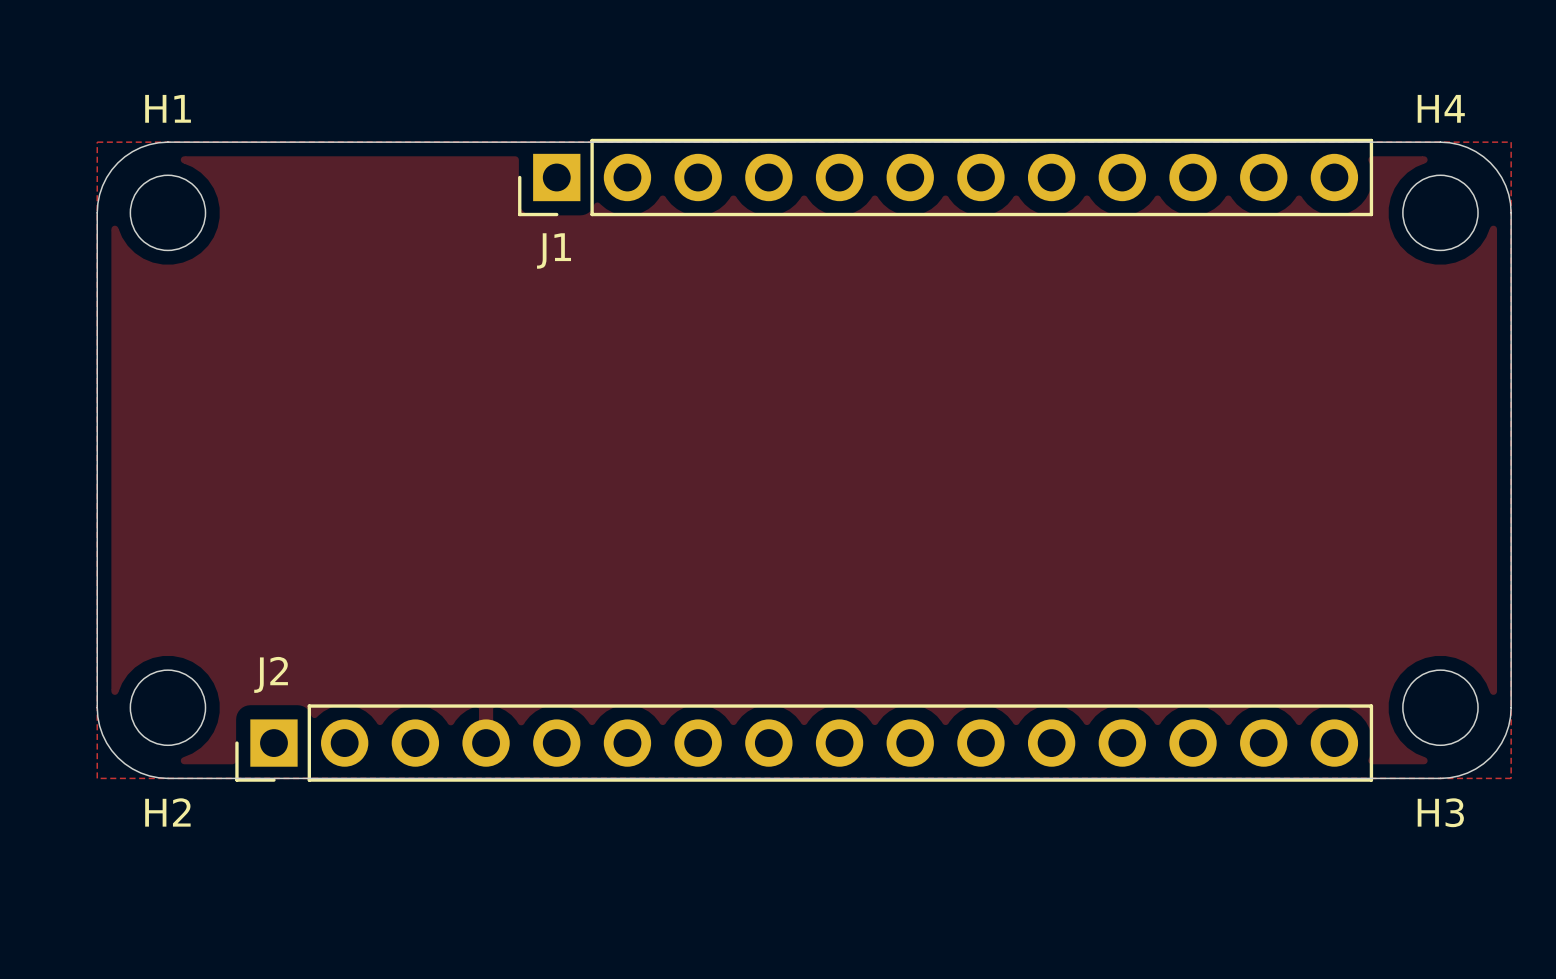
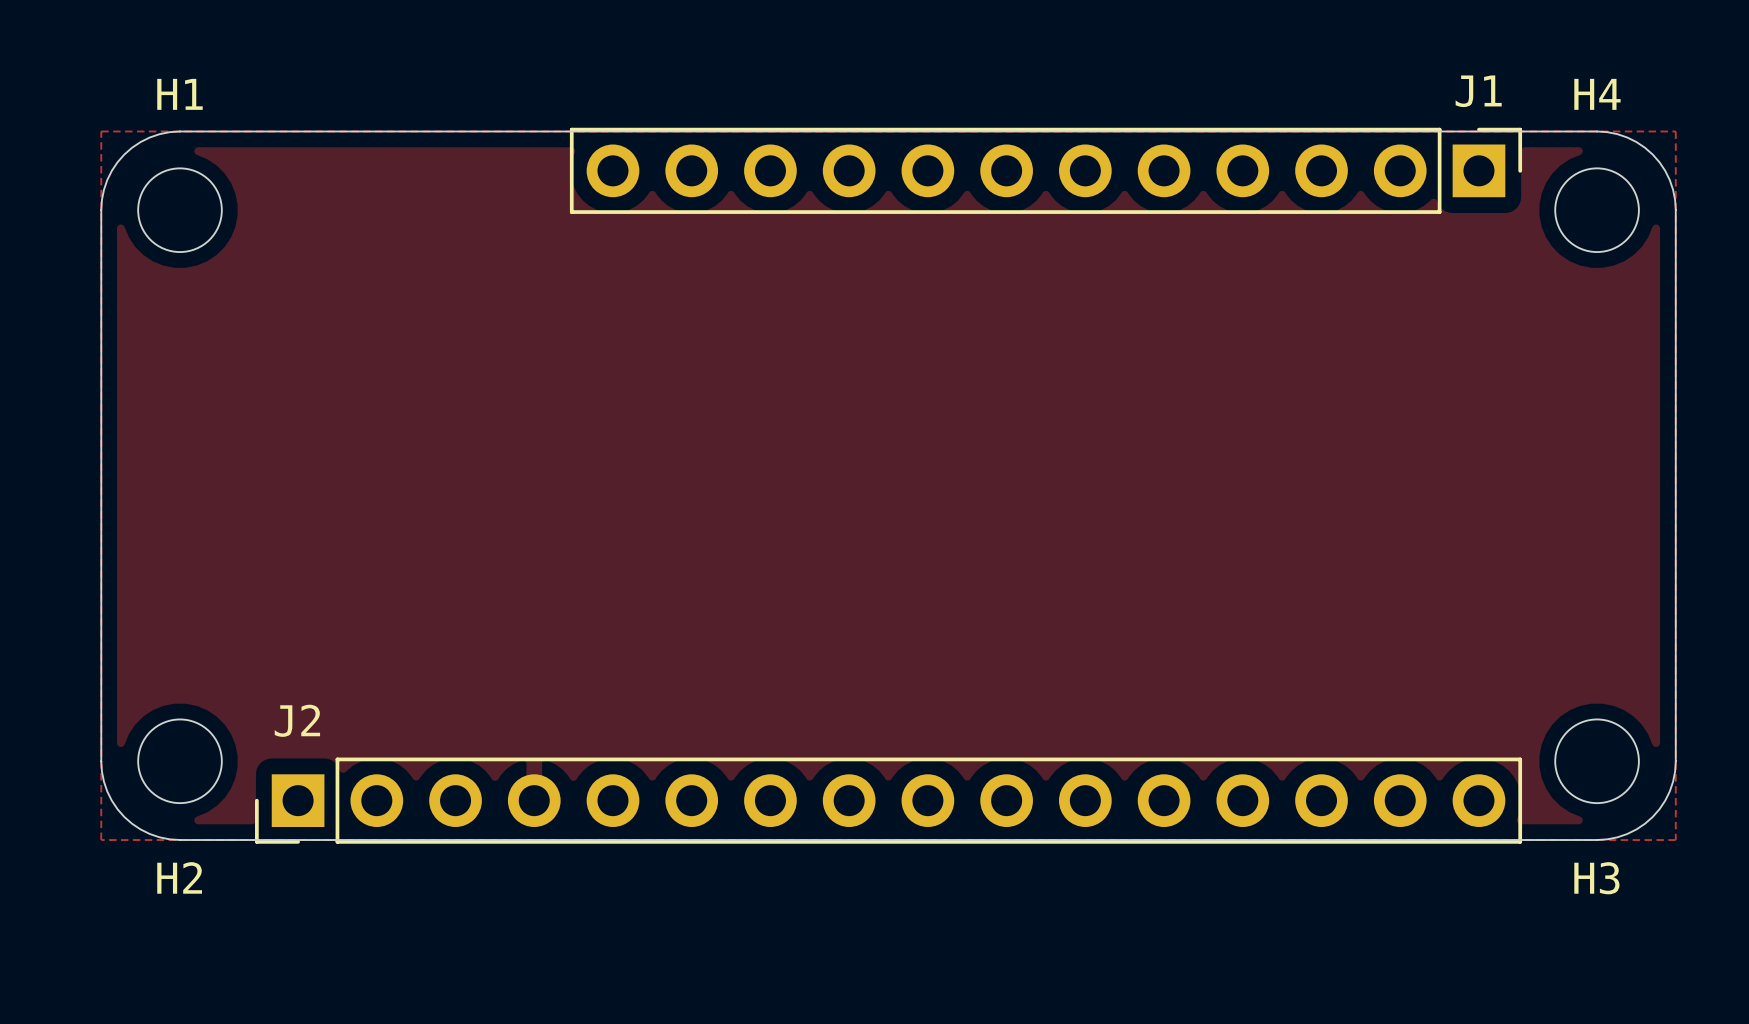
J1 rotation: 0° (945, 177) -> 180° (1045, 170)

